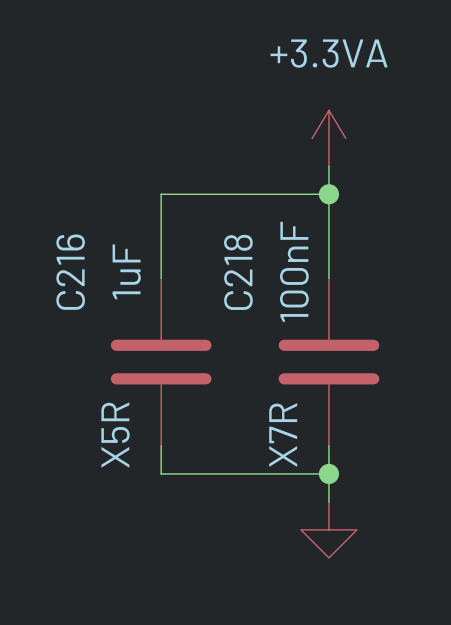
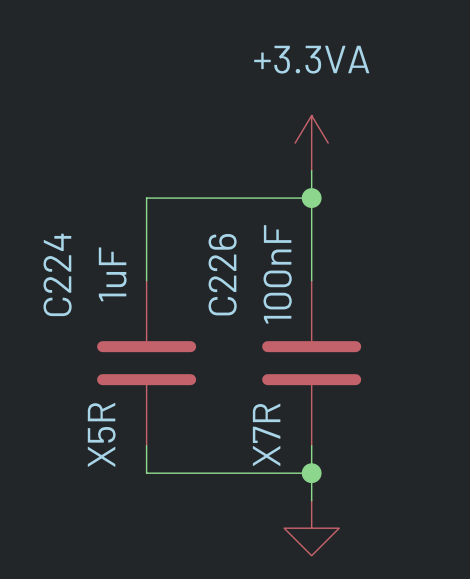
C216 name: C216 (70, 272) -> C224 (57, 274)
C218 name: C218 (238, 272) -> C226 (222, 274)

